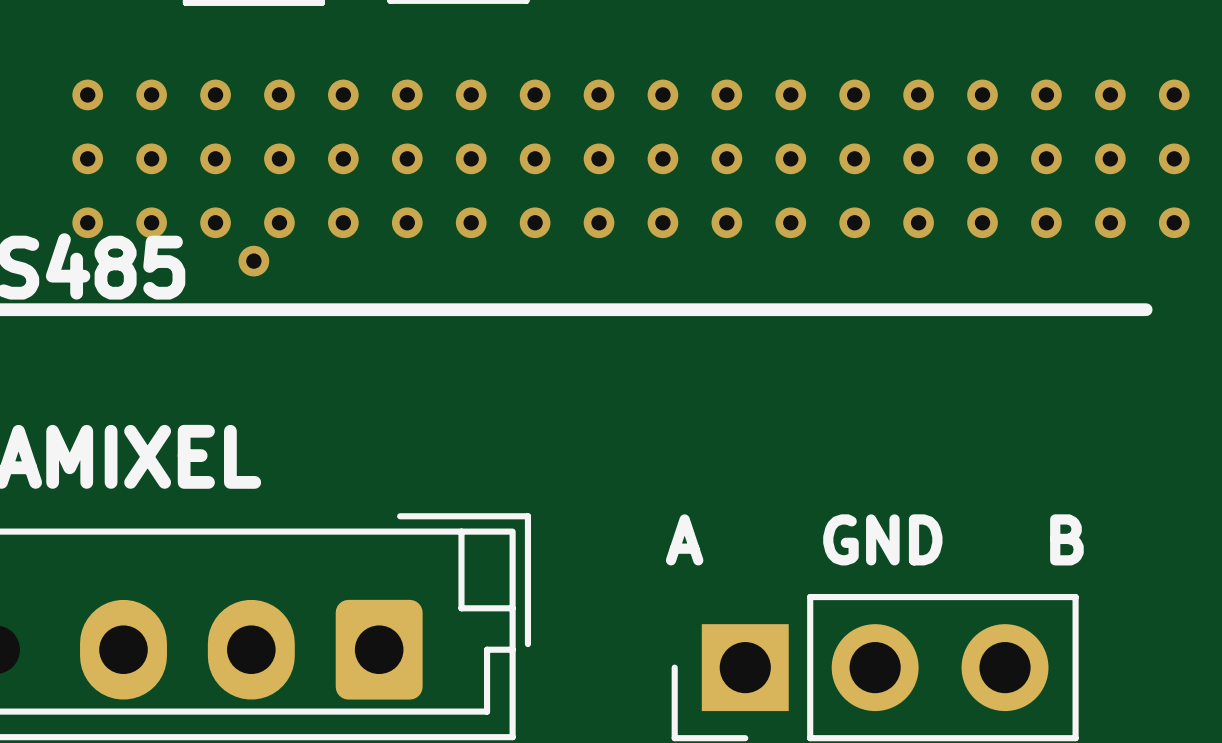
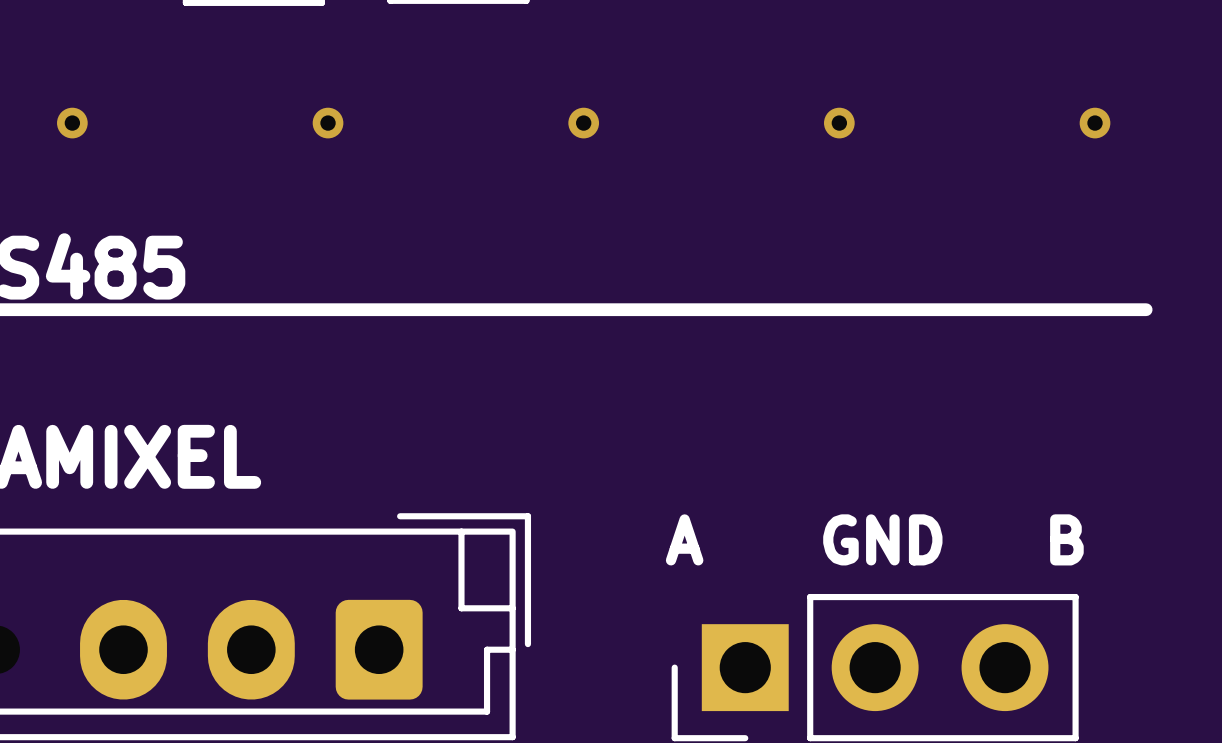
via position: (87, 94) -> (72, 123)
via: (151, 94) -> none
via: (215, 94) -> none
via: (279, 94) -> none
via position: (343, 94) -> (328, 123)
via: (407, 94) -> none
via: (471, 94) -> none
via: (535, 94) -> none
via position: (599, 94) -> (583, 123)
via: (662, 94) -> none
via: (726, 94) -> none
via: (790, 94) -> none
via position: (854, 94) -> (839, 123)
via: (918, 94) -> none
via: (982, 94) -> none
via: (1046, 94) -> none
via position: (1110, 94) -> (1095, 123)
via: (1174, 94) -> none
via: (87, 158) -> none
via: (151, 158) -> none
via: (215, 158) -> none
via: (279, 158) -> none
via: (343, 158) -> none
via: (407, 158) -> none
via: (471, 158) -> none
via: (535, 158) -> none
via: (599, 158) -> none
via: (662, 158) -> none
via: (726, 158) -> none
via: (790, 158) -> none
via: (854, 158) -> none
via: (918, 158) -> none
via: (982, 158) -> none
via: (1046, 158) -> none
via: (1110, 158) -> none
via: (1174, 158) -> none
via: (87, 222) -> none
via: (151, 222) -> none
via: (215, 222) -> none
via: (279, 222) -> none
via: (343, 222) -> none
via: (407, 222) -> none
via: (471, 222) -> none
via: (535, 222) -> none
via: (599, 222) -> none
via: (662, 222) -> none
via: (726, 222) -> none
via: (790, 222) -> none
via: (854, 222) -> none
via: (918, 222) -> none
via: (982, 222) -> none
via: (1046, 222) -> none
via: (1110, 222) -> none
via: (1174, 222) -> none
via: (253, 261) -> none

